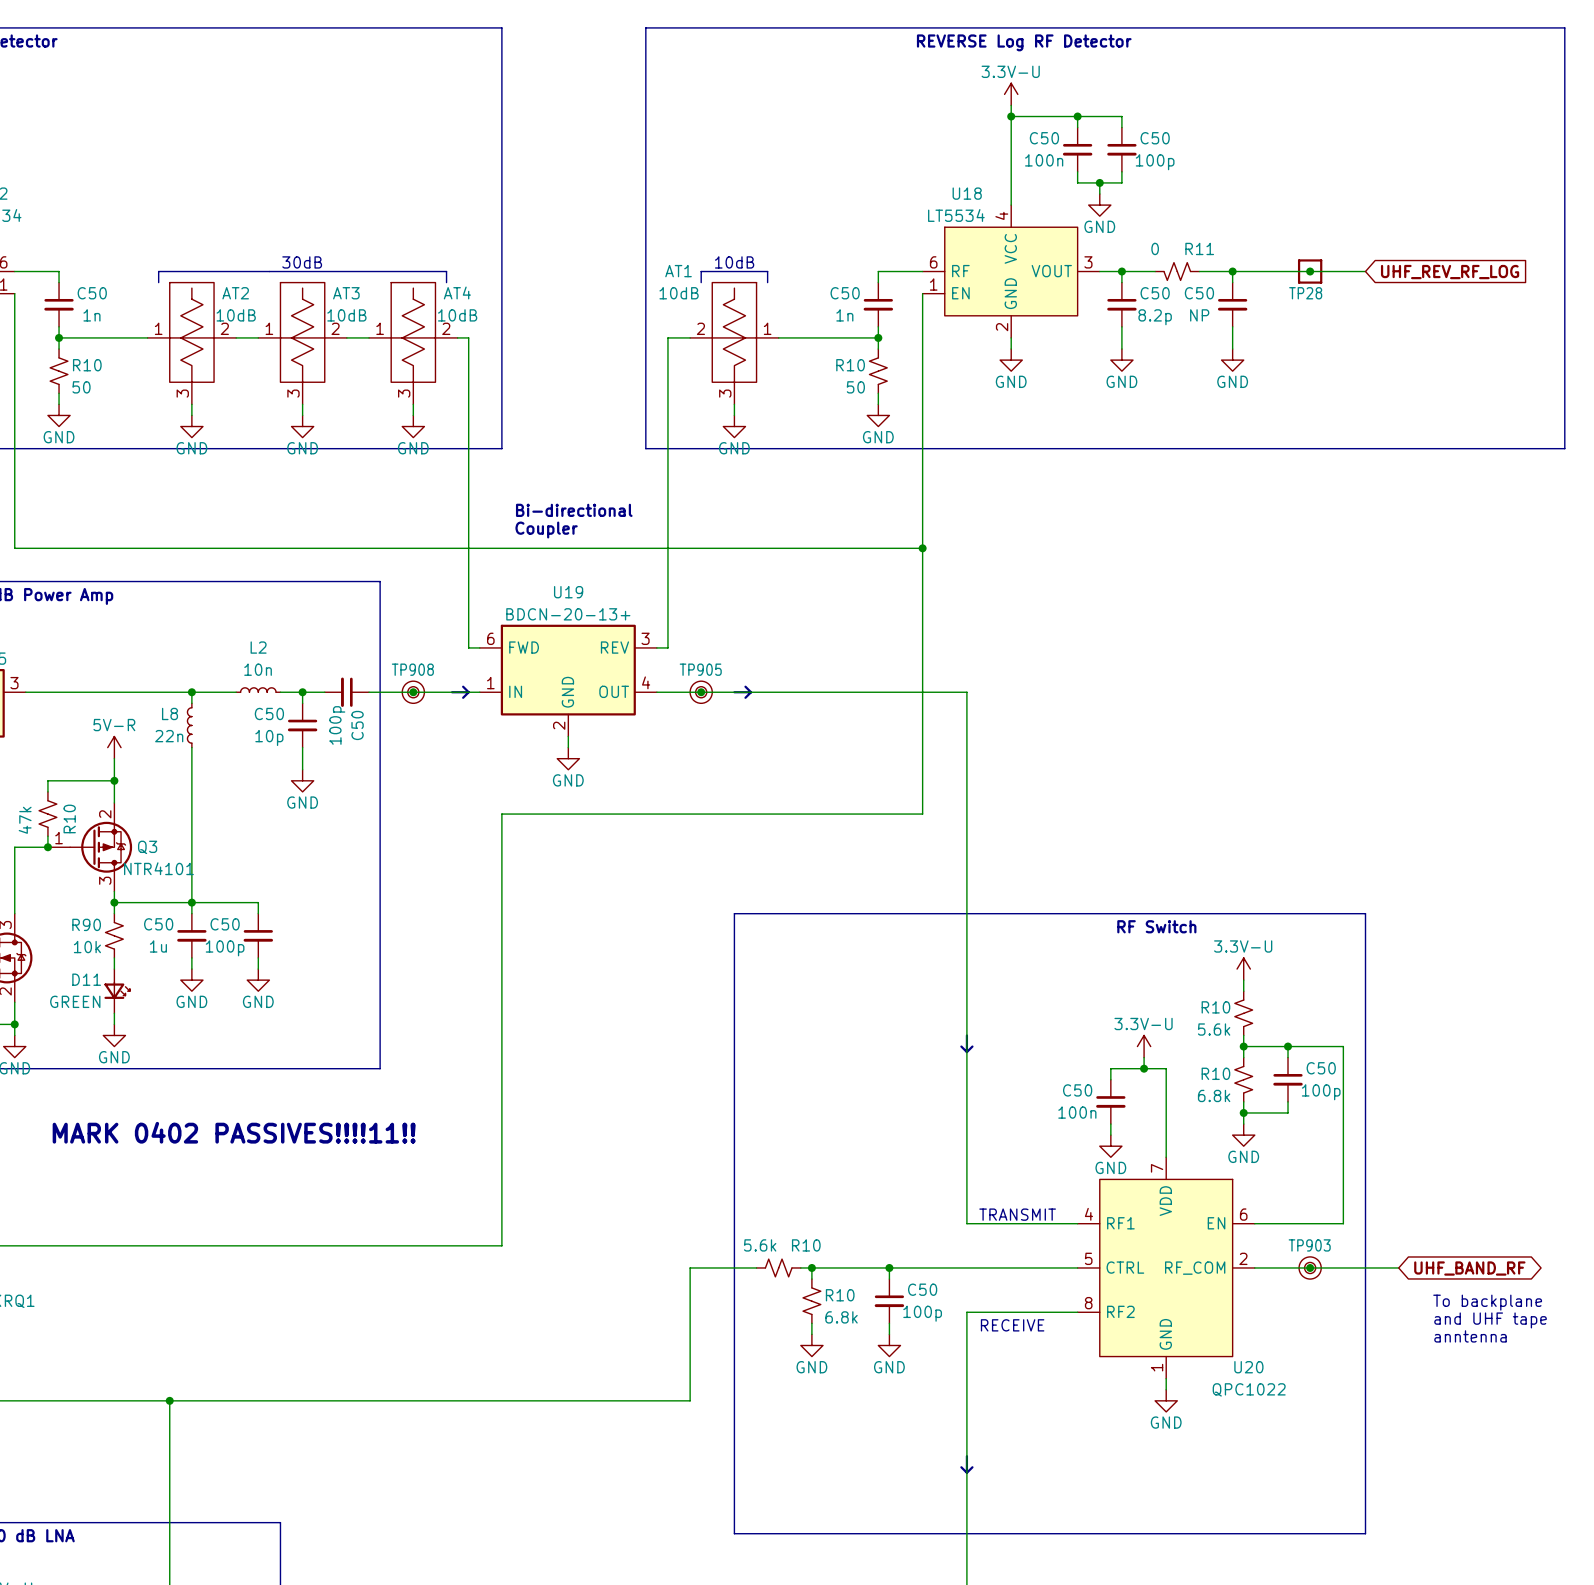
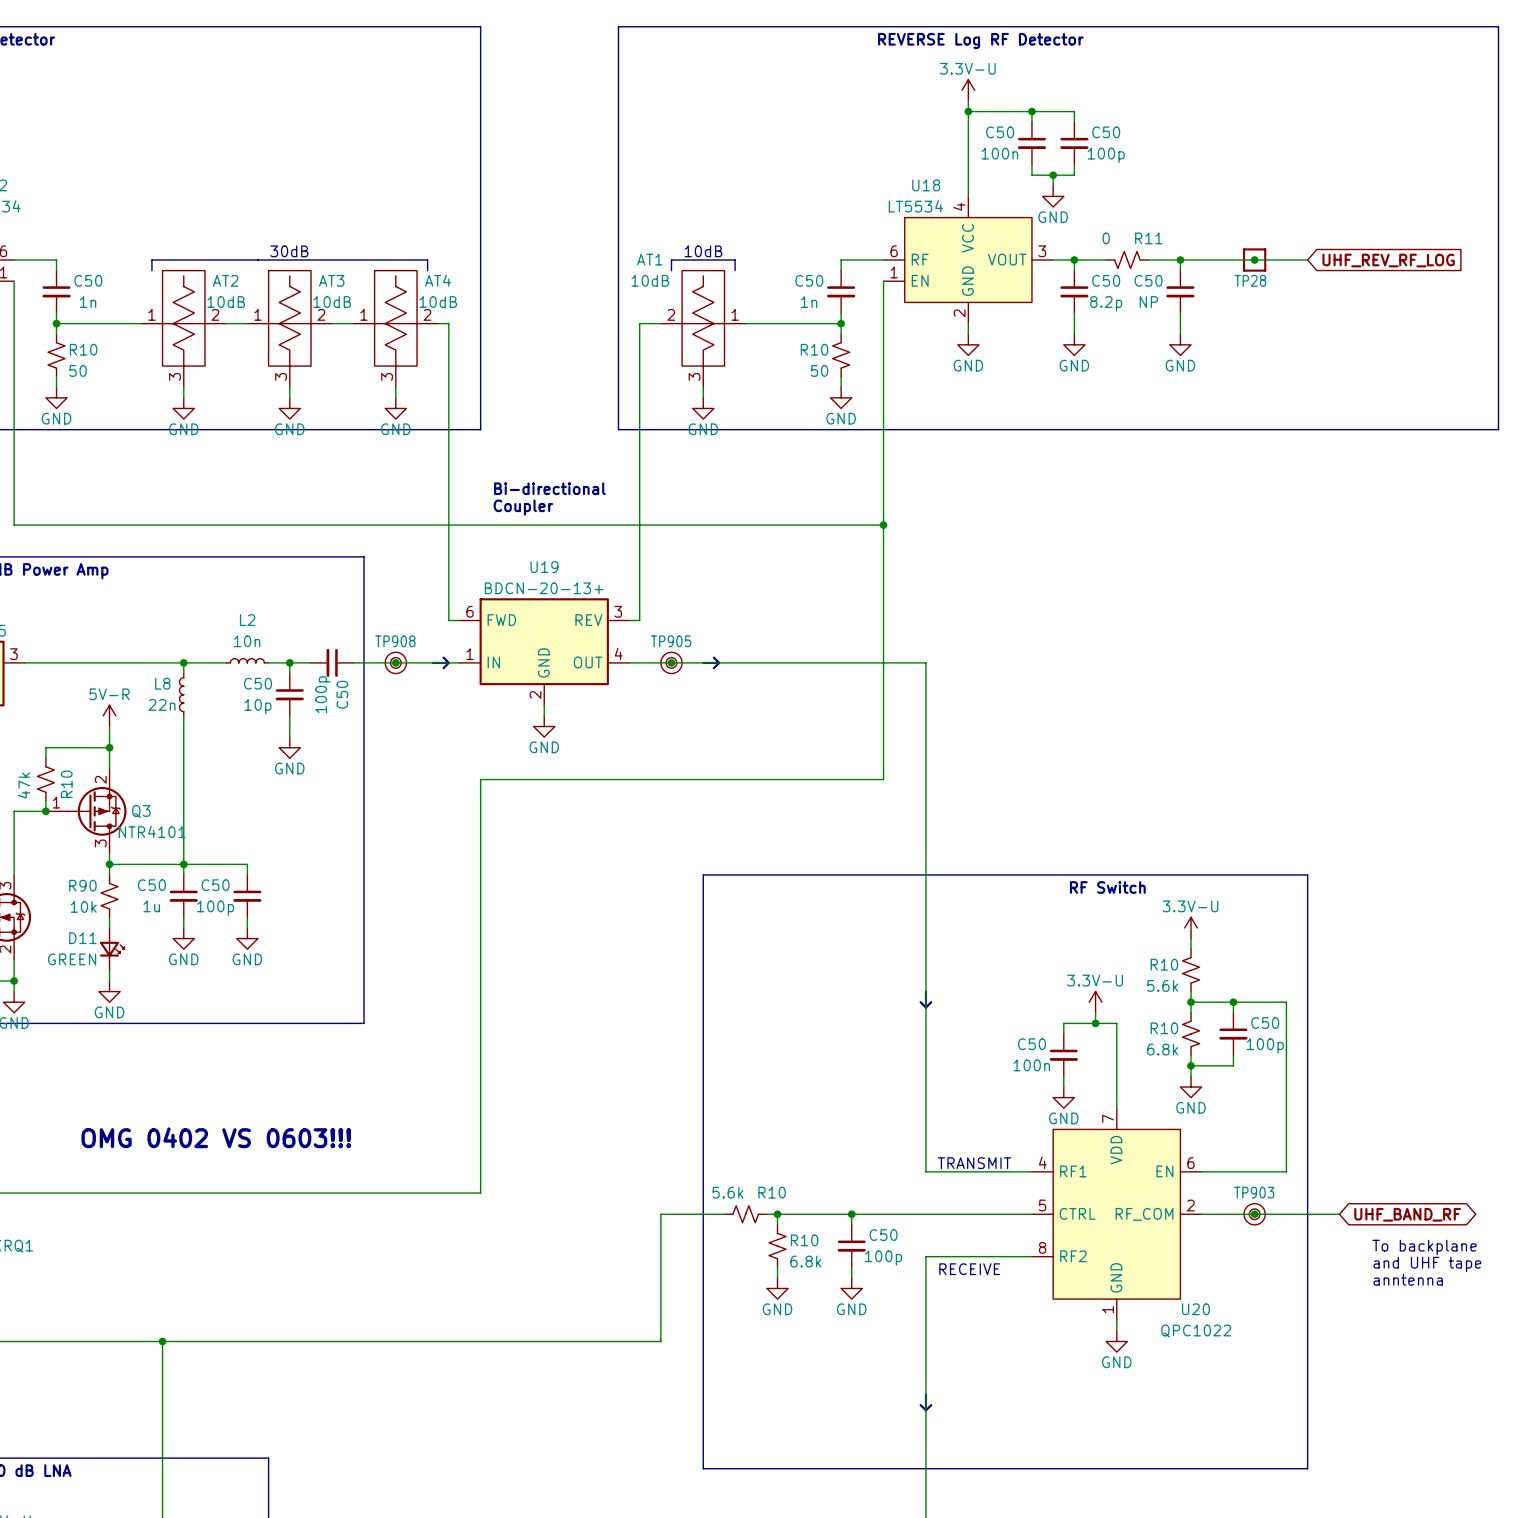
text: MARK 0402 PASSIVES!!!!11!! (234, 1132) -> none
text: none -> OMG 0402 VS 0603!!! (216, 1137)

